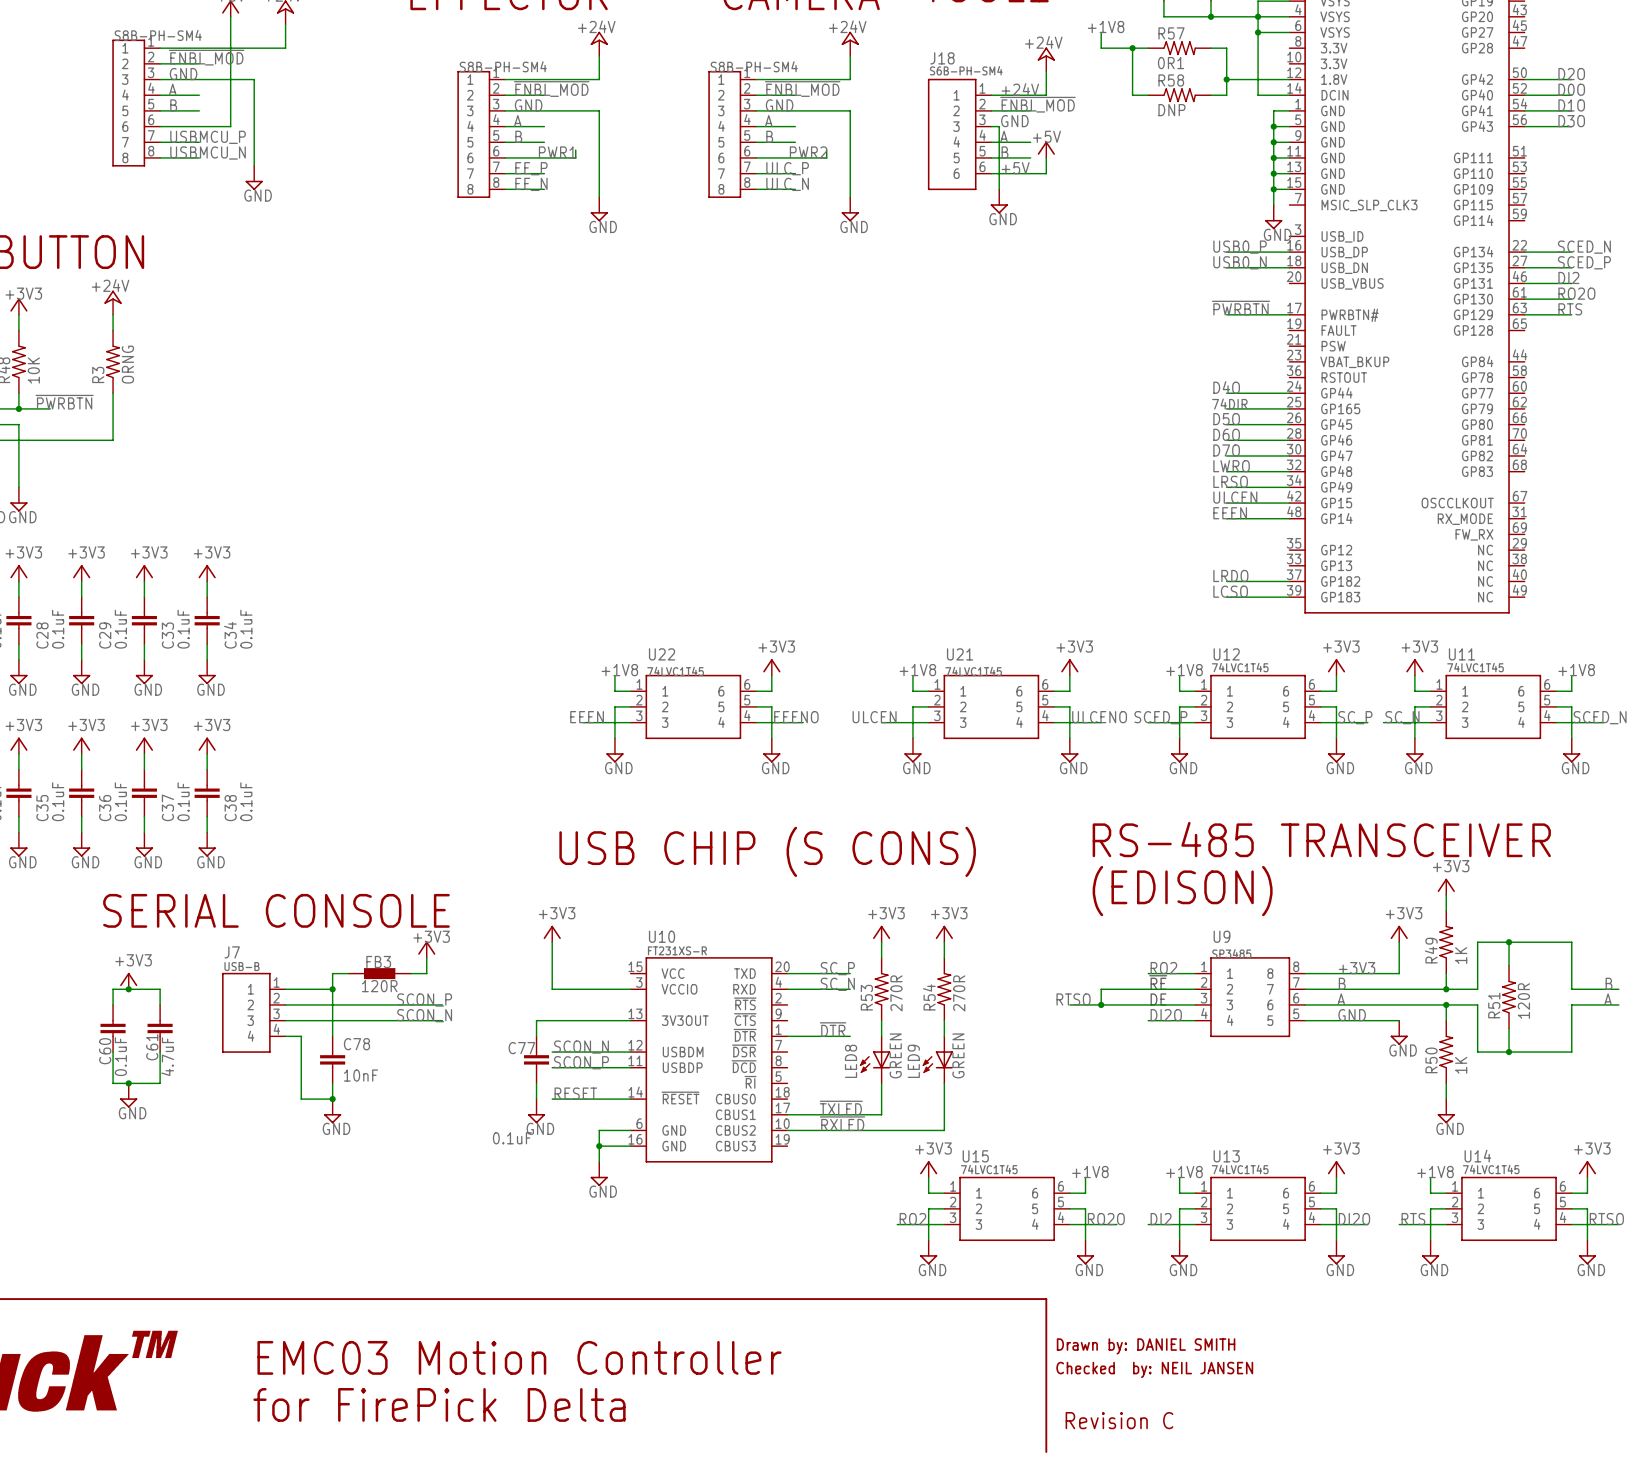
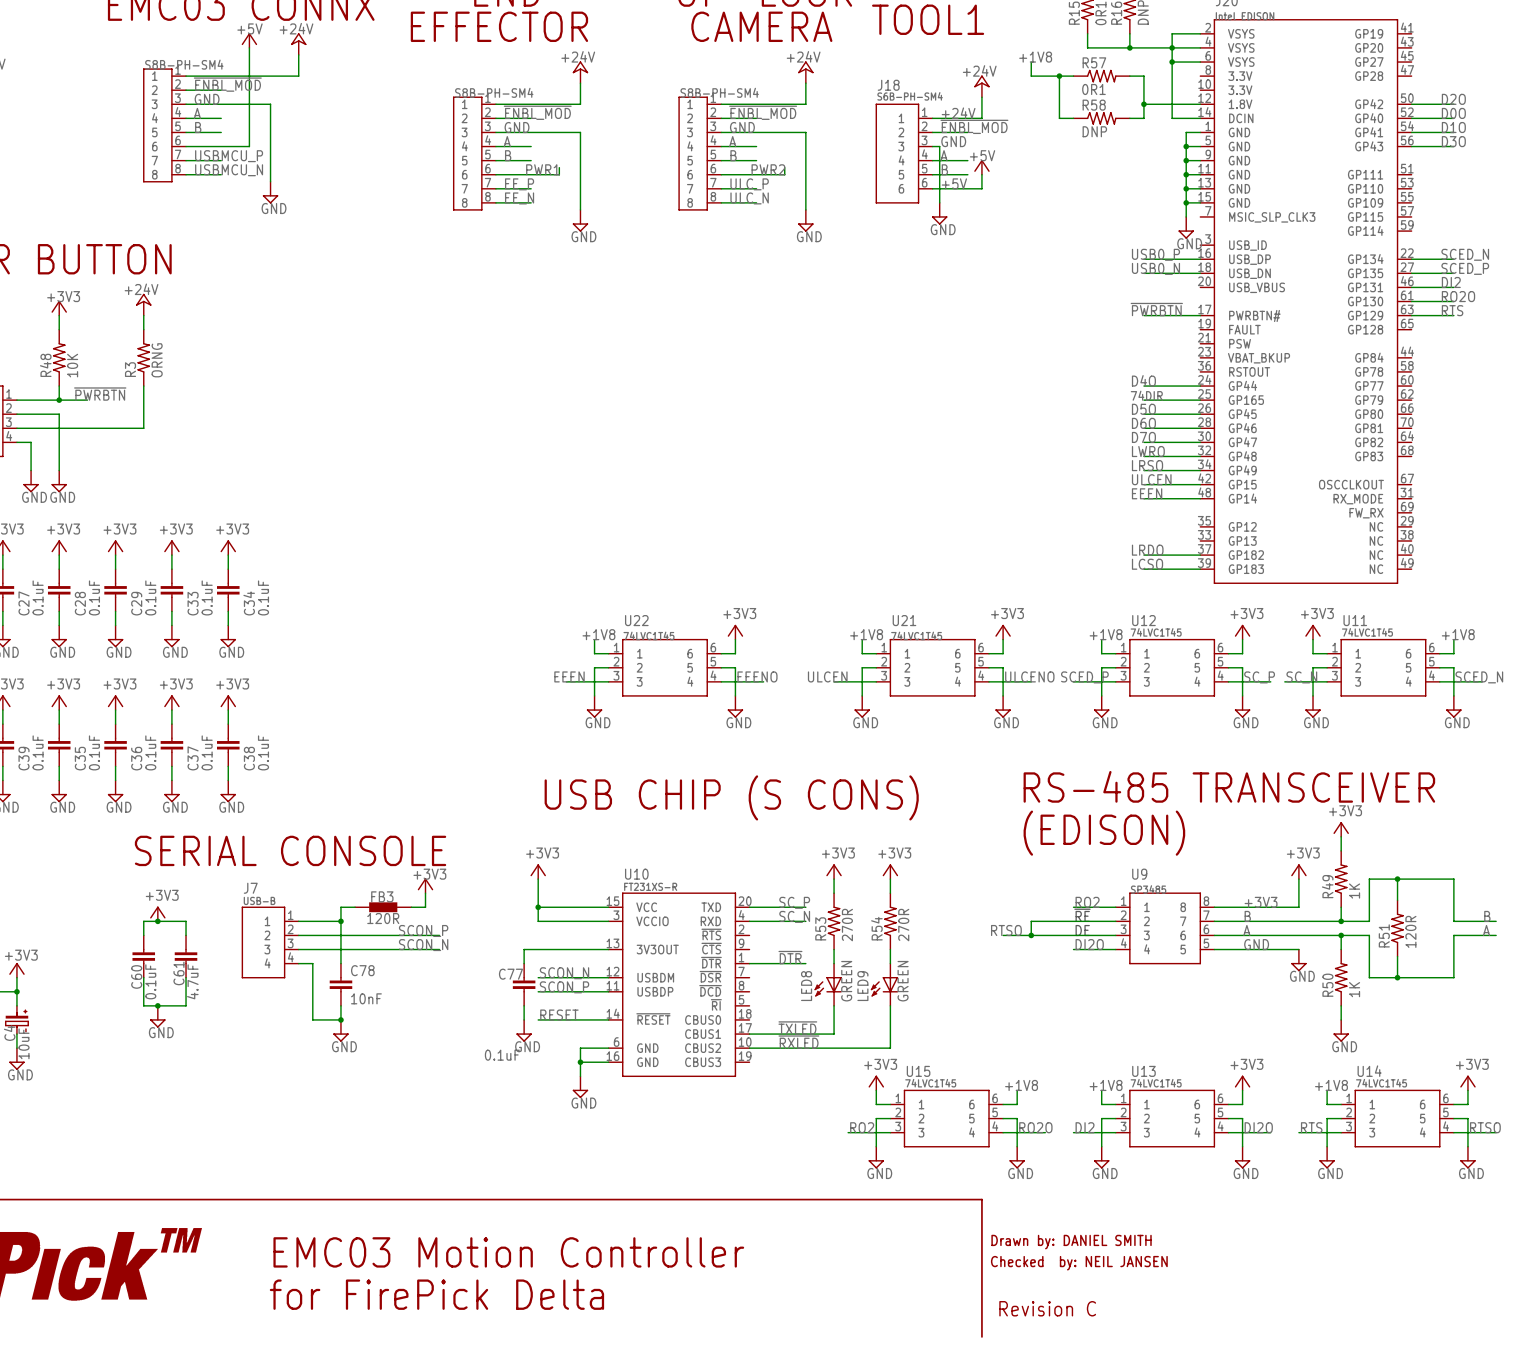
wire: none -> (538, 907) (608, 907)
junction: none -> (538, 907)

